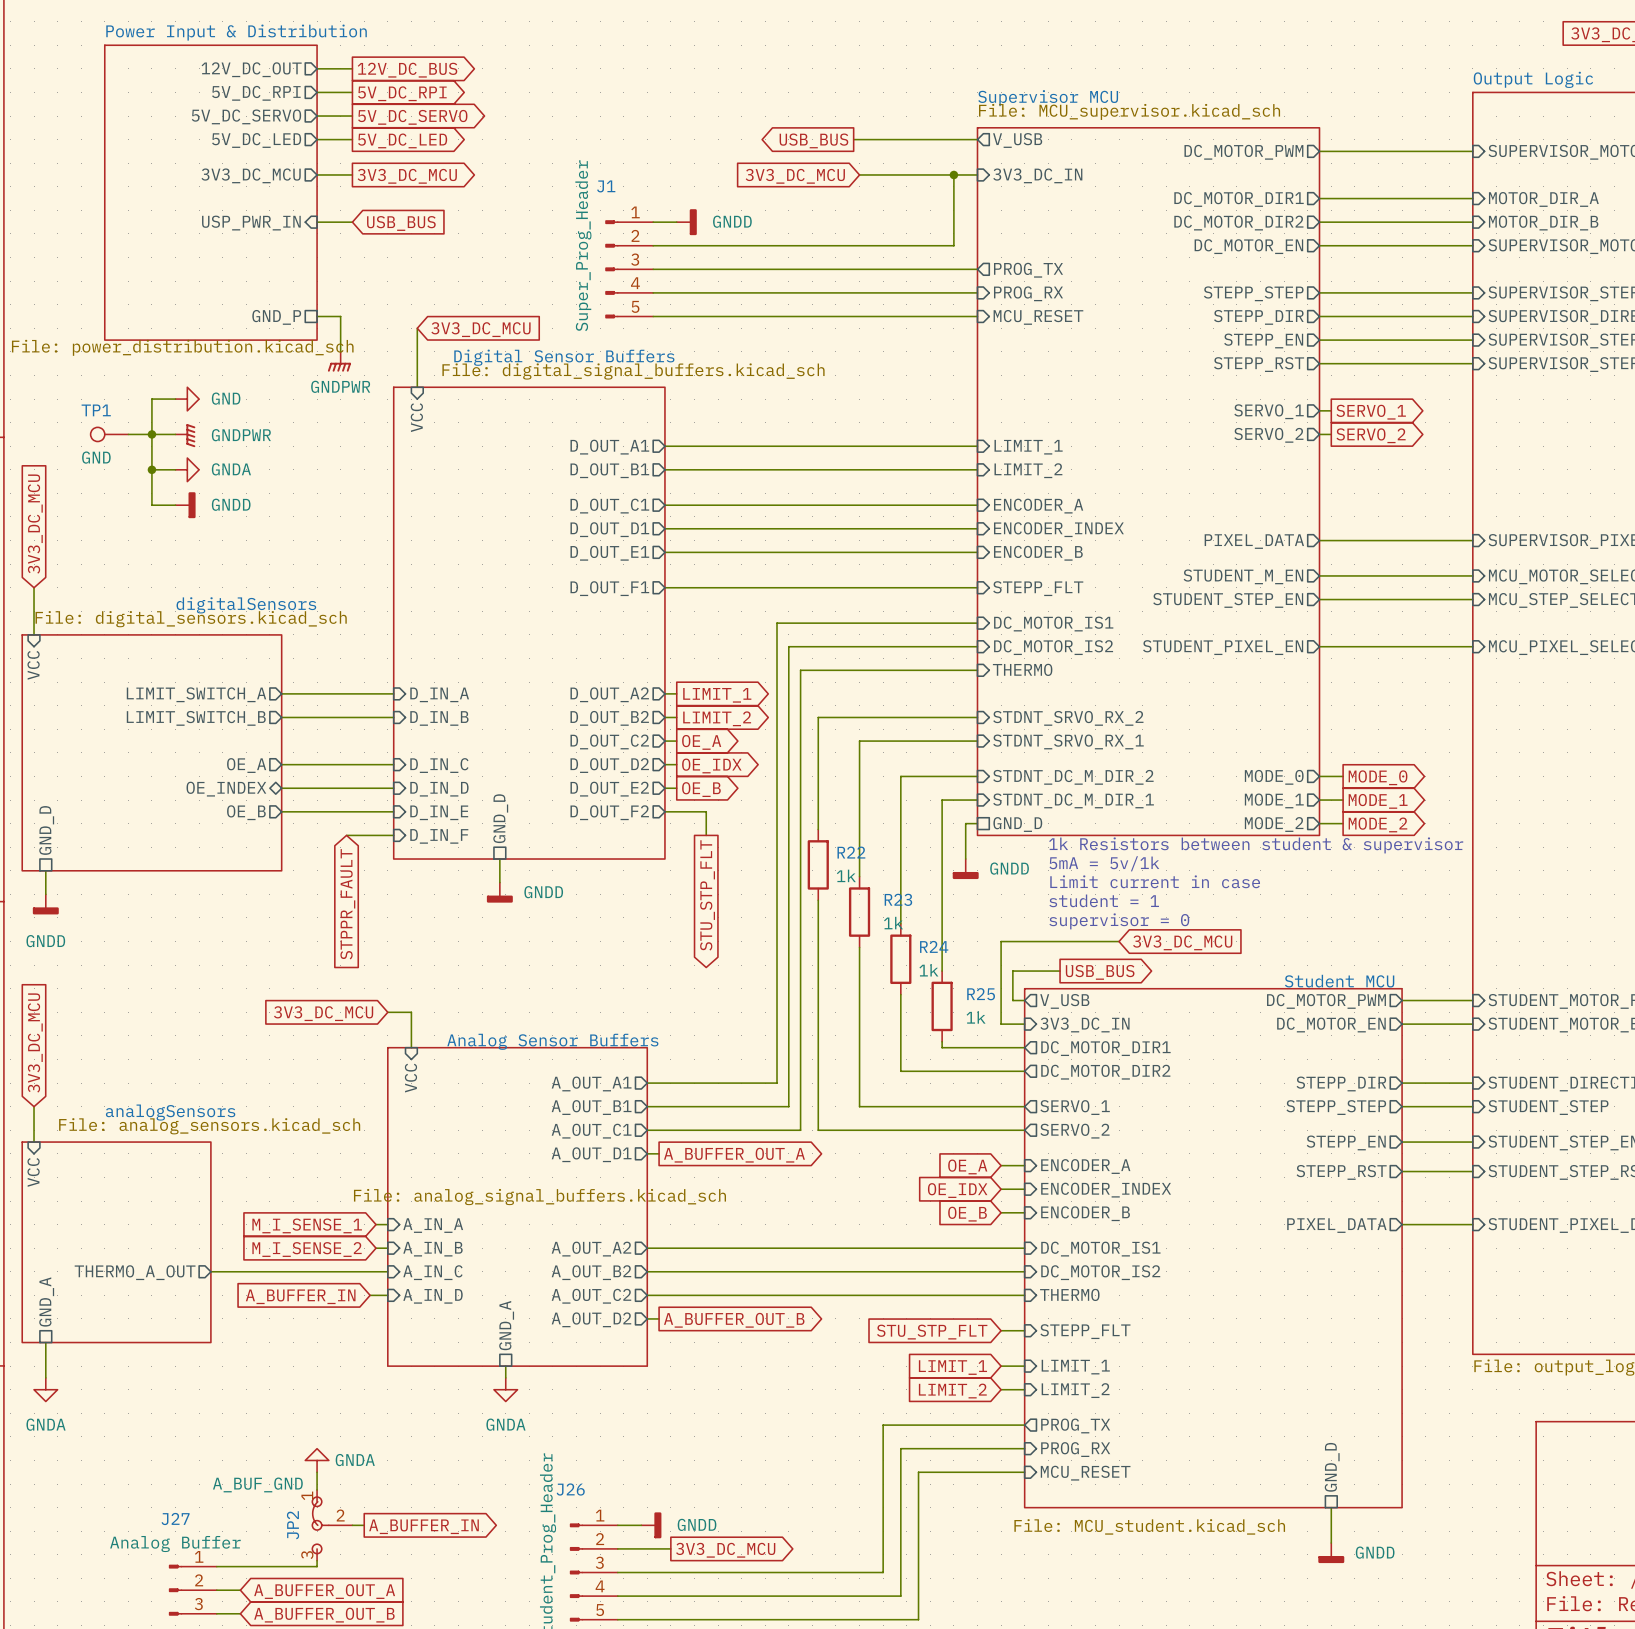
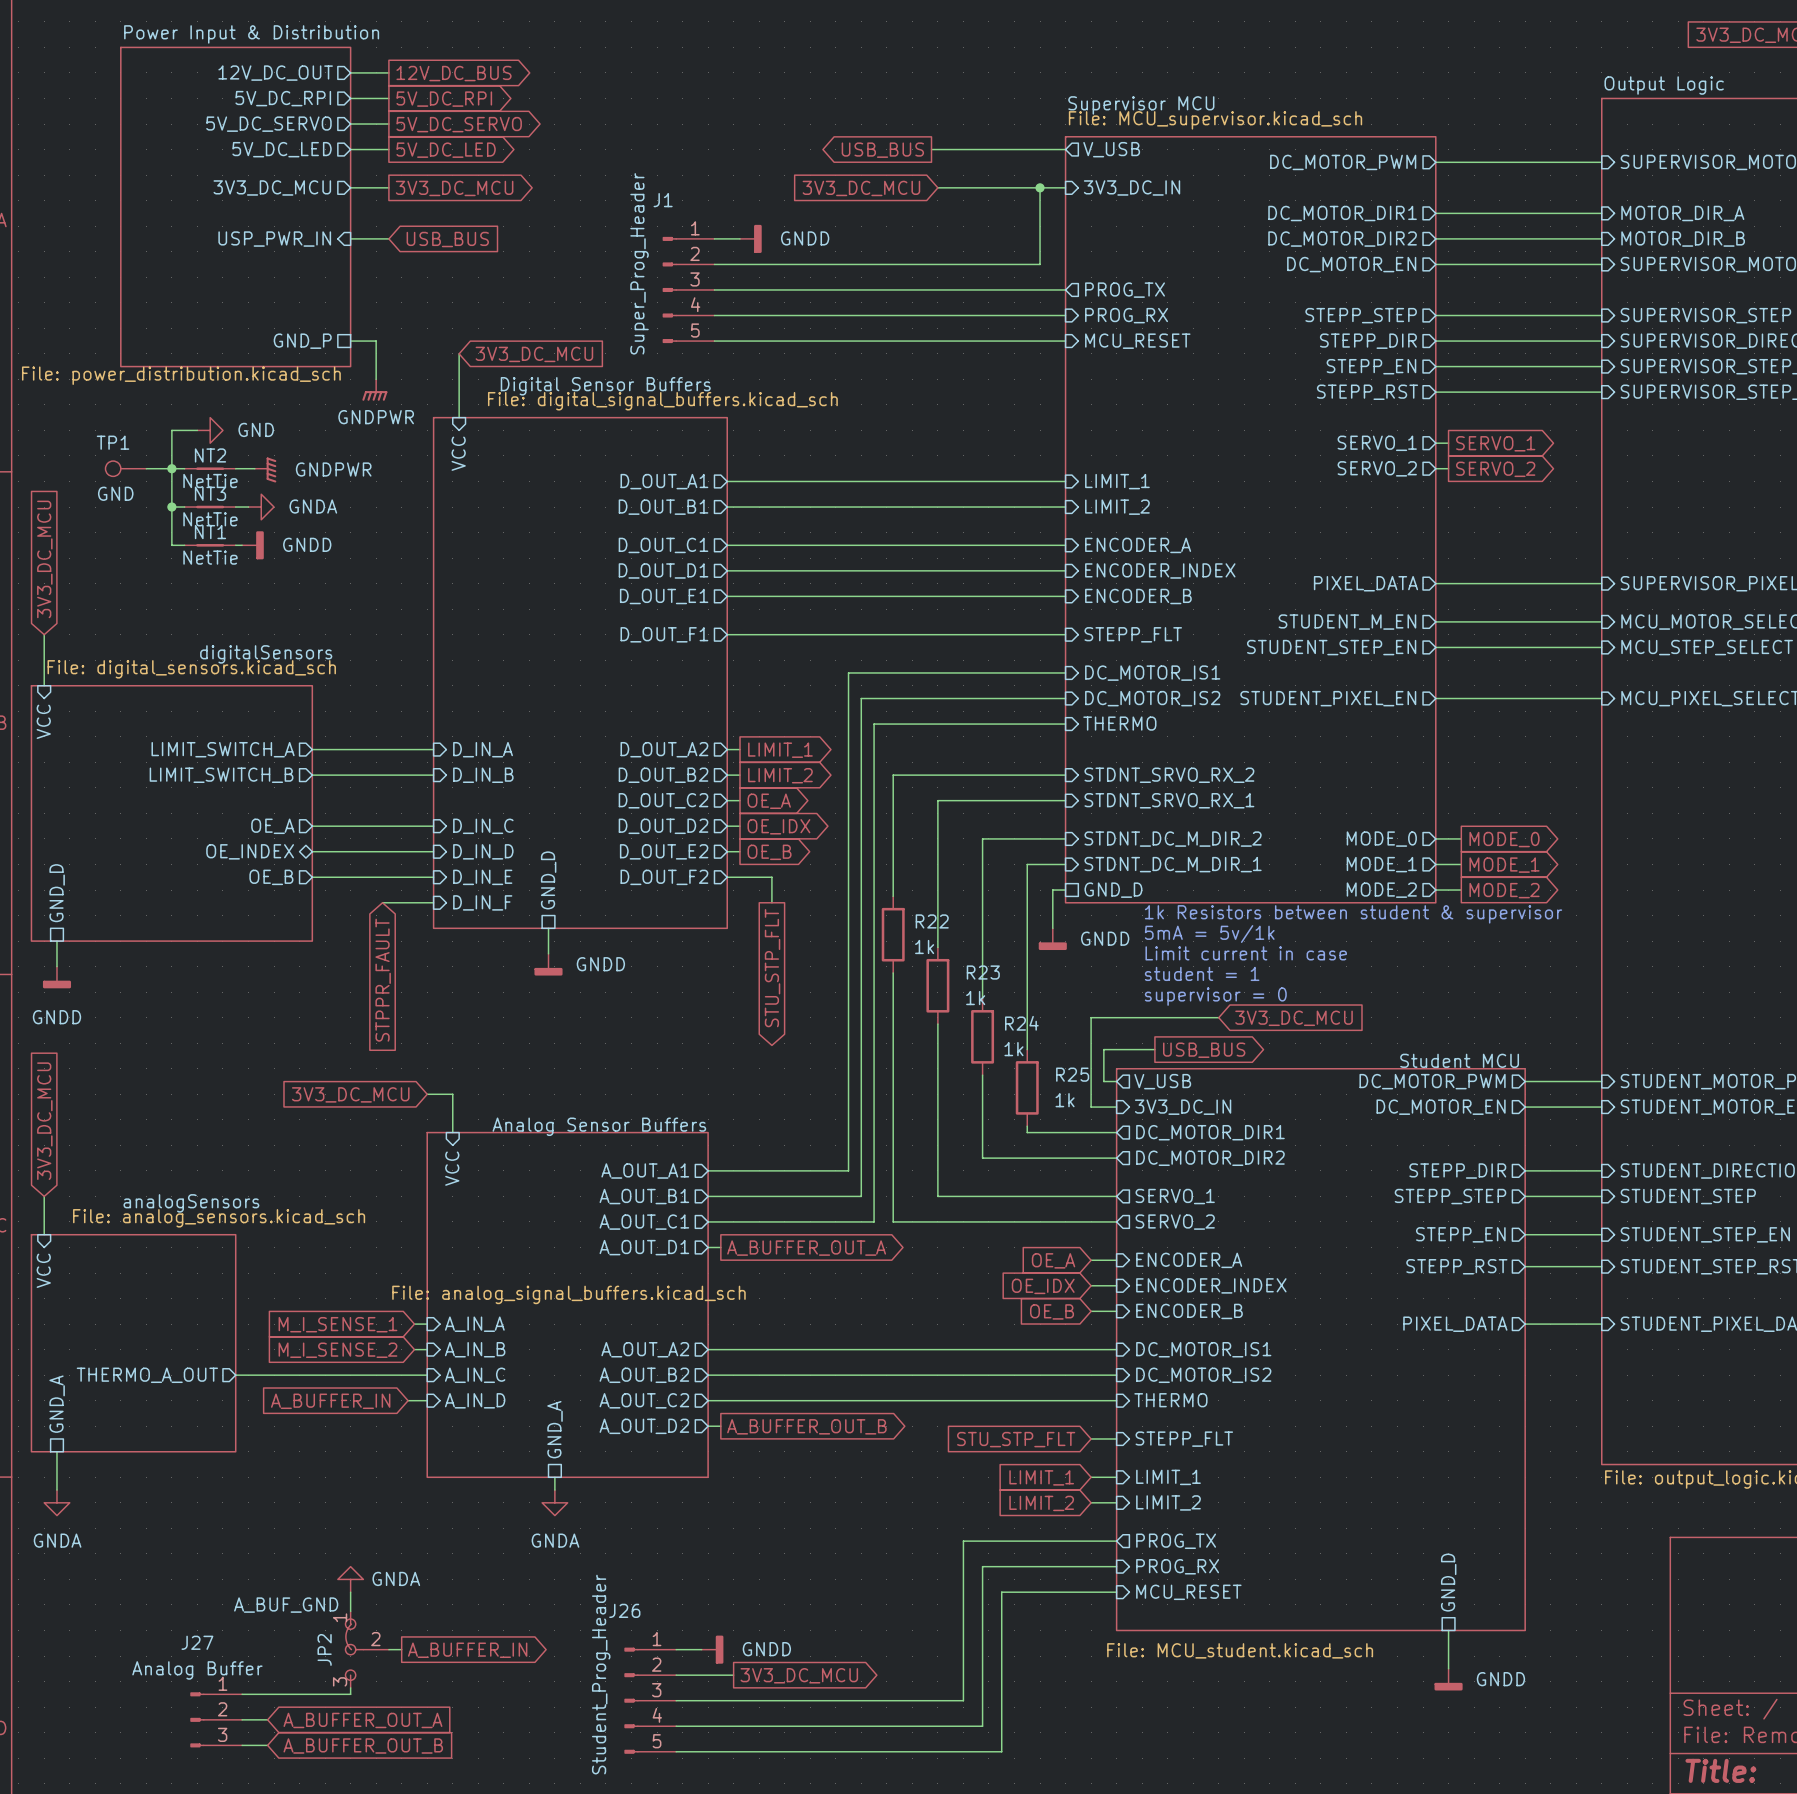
NT2: none -> NetTie (210, 468)
wire: none -> (235, 468) (254, 468)
power symbol position: GNDPWR (185, 435) -> GNDPWR (265, 469)
power symbol position: GNDA (187, 469) -> GNDA (261, 507)
NT3: none -> NetTie (210, 507)
power symbol position: GNDD (185, 505) -> GNDD (252, 545)
NT1: none -> NetTie (210, 545)
wire: none -> (235, 545) (242, 545)

